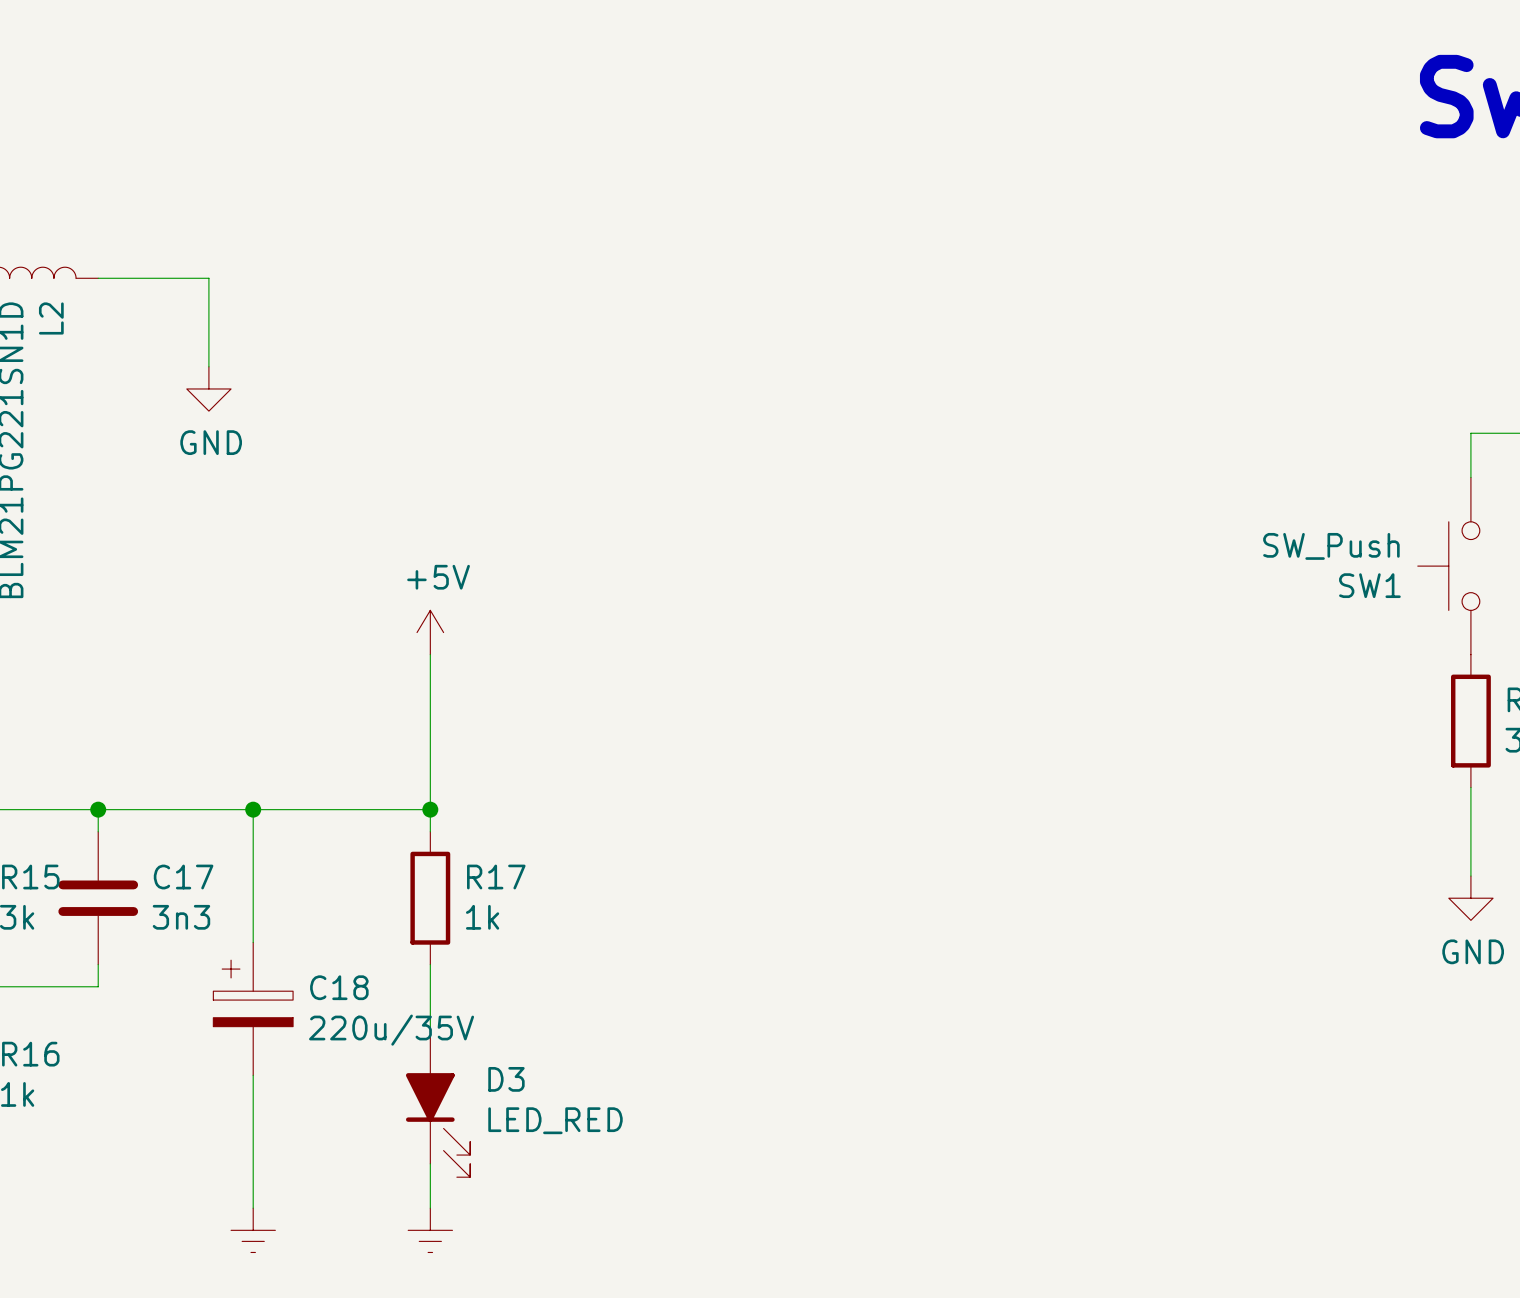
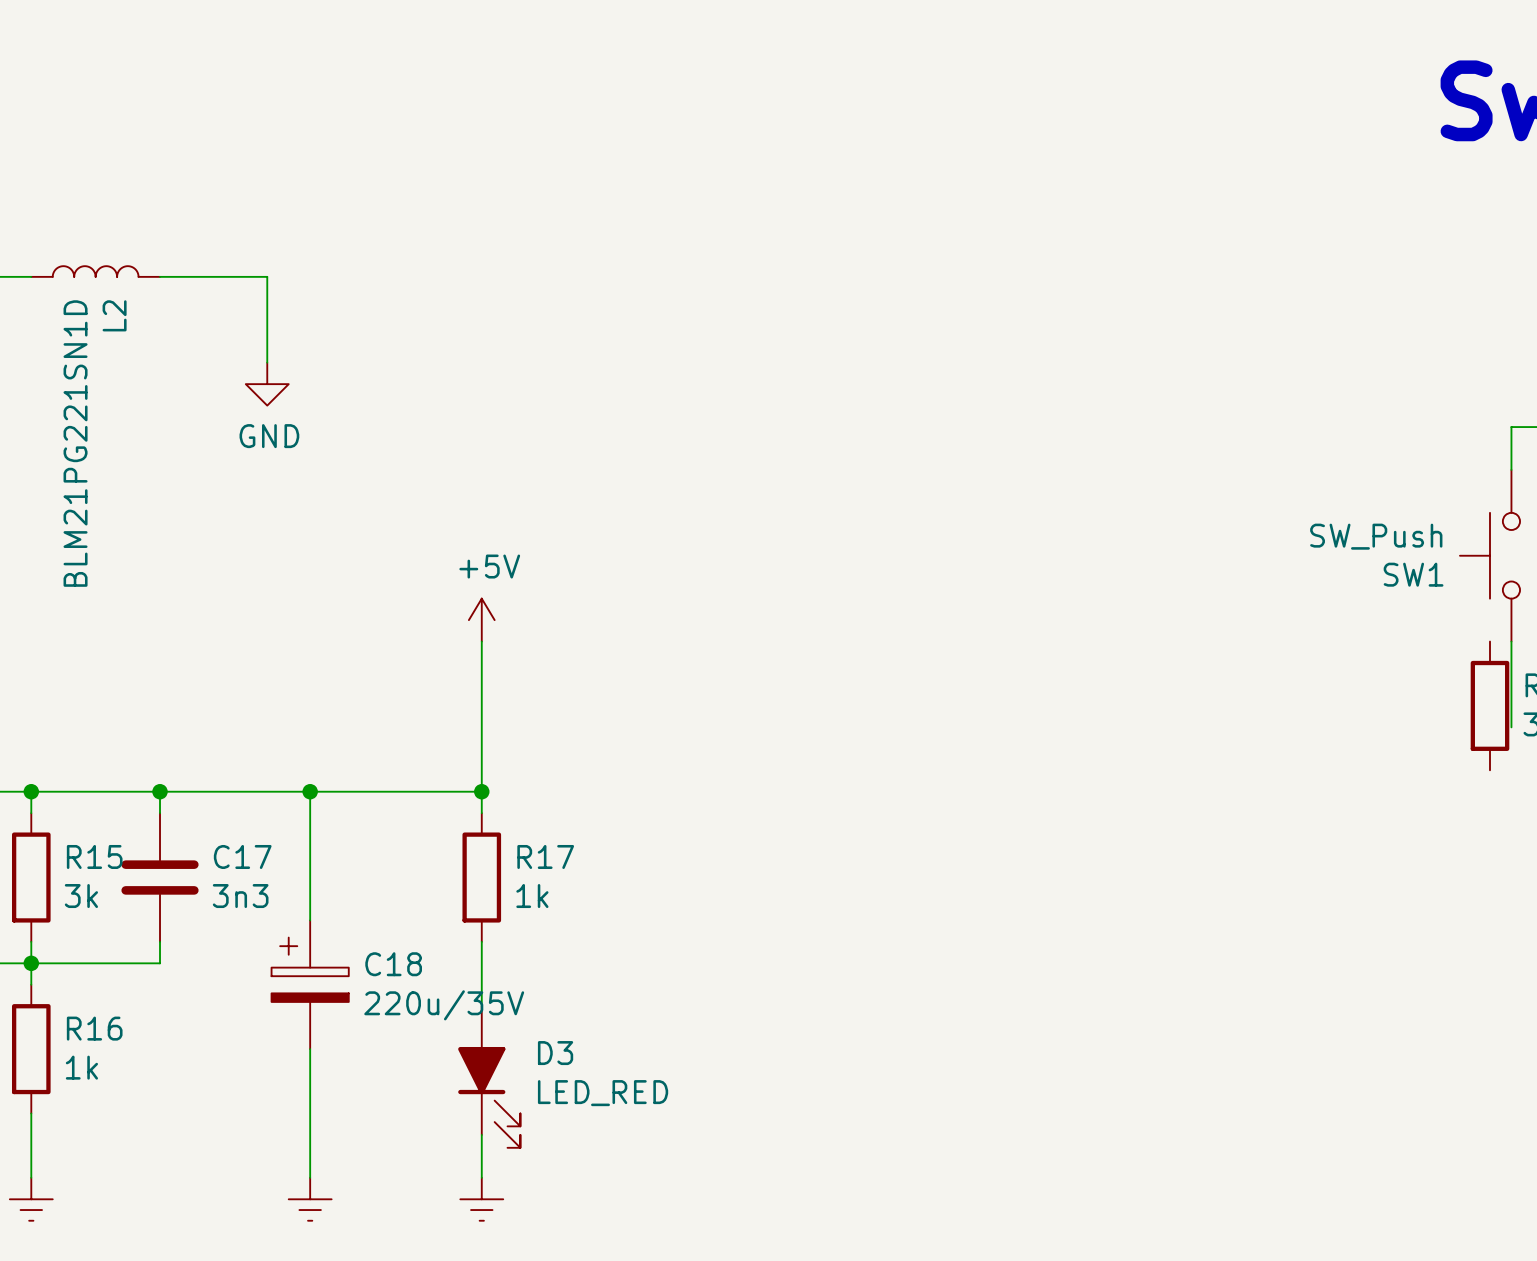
wire: (1493, 433) (1470, 433) (1470, 477) -> (1511, 427) (1511, 469)
SW1 position: (1448, 566) -> (1490, 555)
wire: (1470, 787) (1470, 876) -> (1511, 641) (1511, 727)
power symbol: GND (1470, 898) -> none

